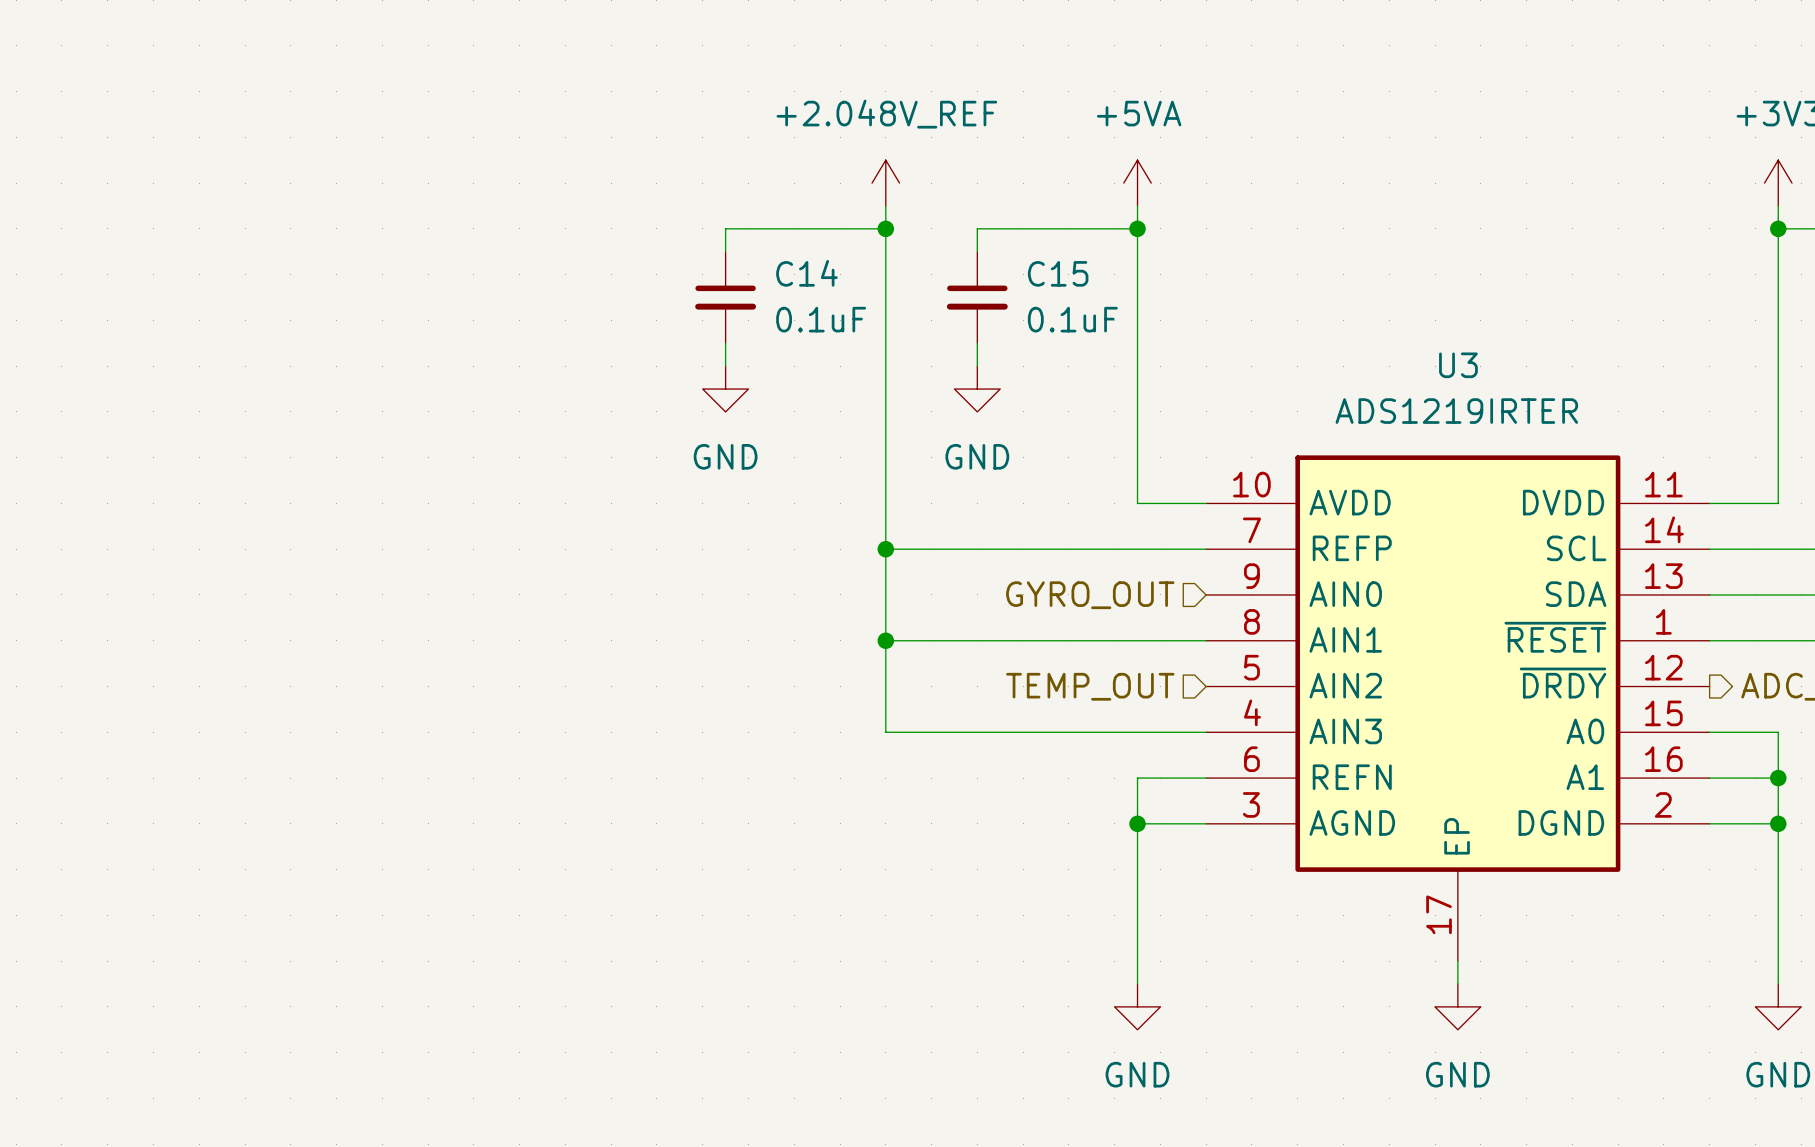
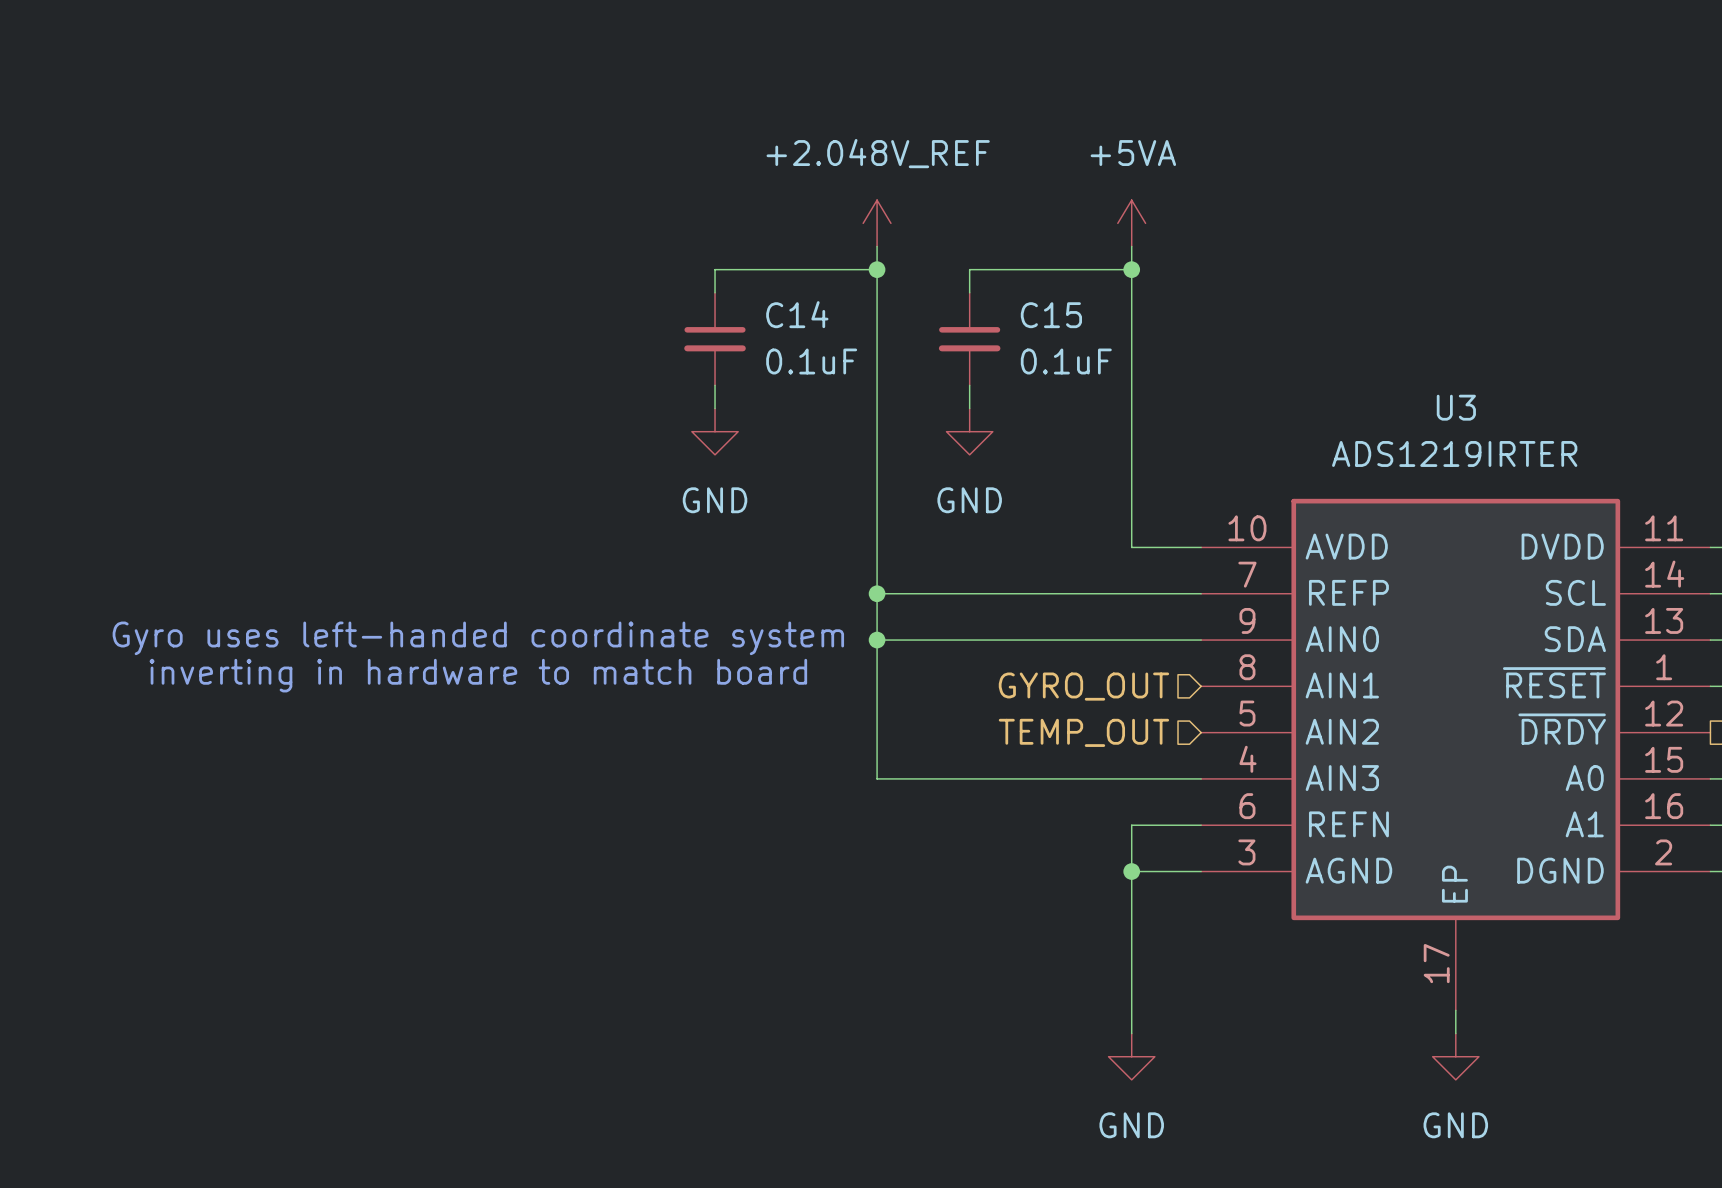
text: none -> Gyro uses left-handed coordinate system (478, 638)
hierarchical label position: GYRO_OUT (1090, 595) -> GYRO_OUT (1083, 686)
text: none -> inverting in hardware to match board (478, 675)
wire: (885, 640) (1206, 640) -> (877, 640) (1201, 640)
junction position: (885, 640) -> (877, 640)

